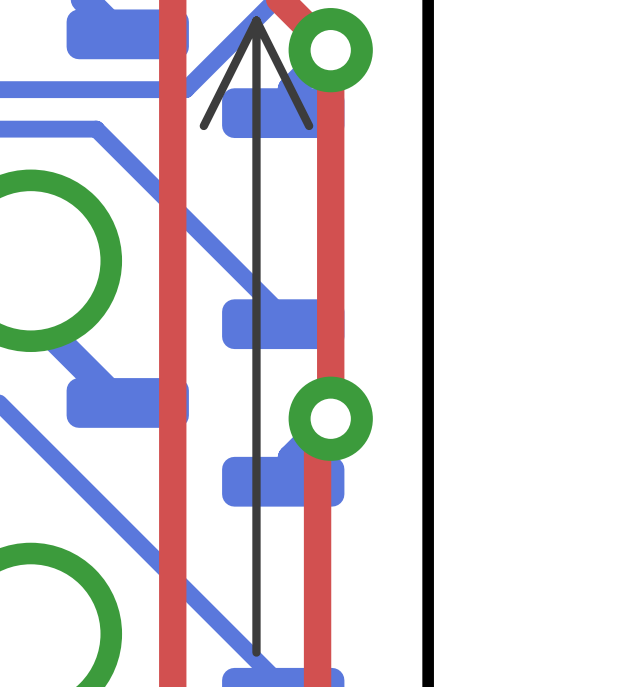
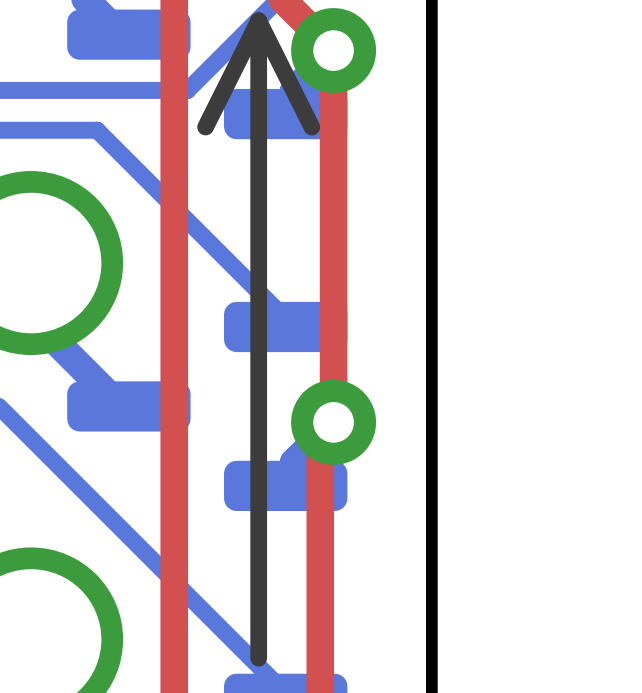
line width: thin (256, 20) (203, 125) -> thick (258, 20) (205, 127)
line width: thin (256, 20) (309, 125) -> thick (258, 20) (311, 127)
line width: thin (256, 20) (256, 652) -> thick (258, 20) (258, 658)

